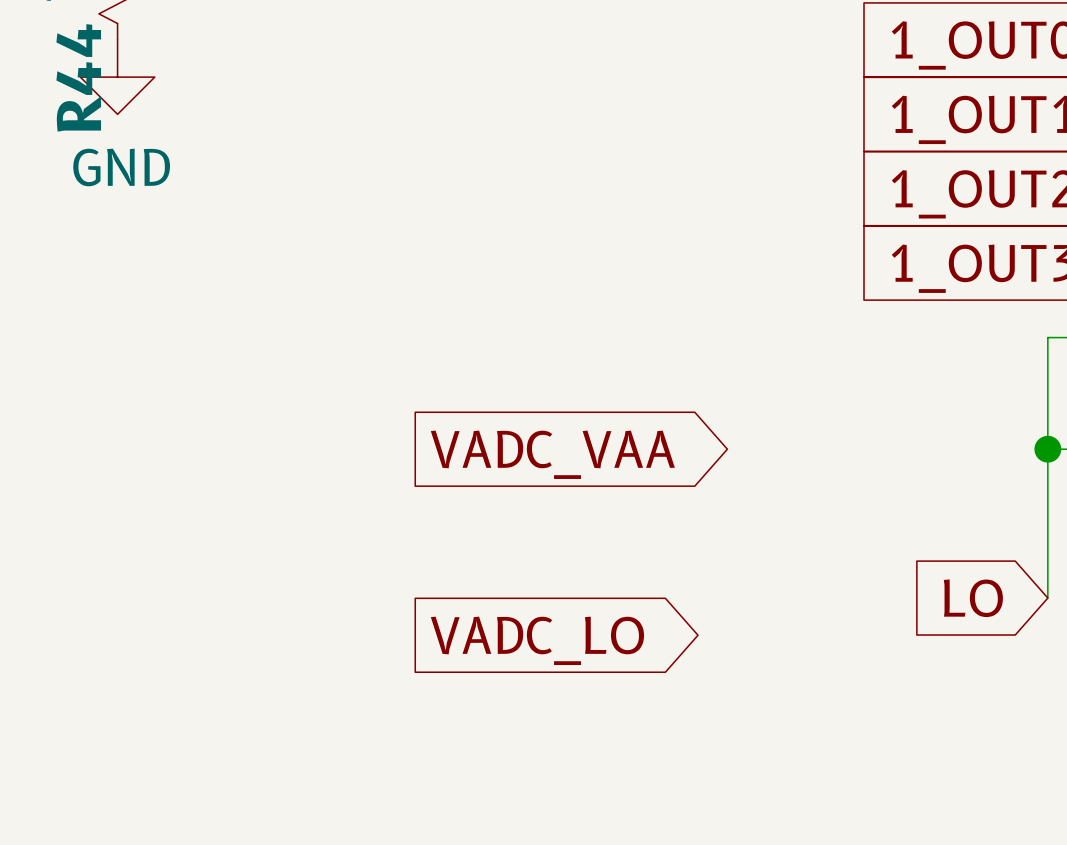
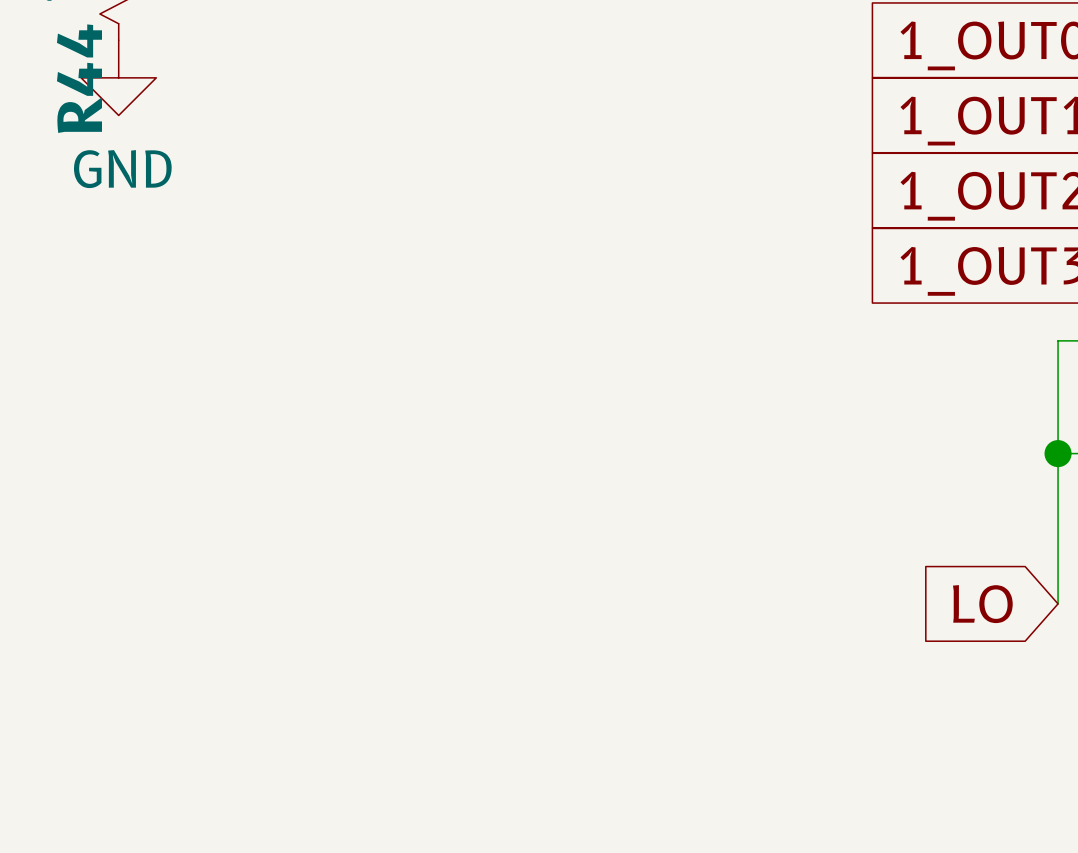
global label: VADC_VAA (552, 454) -> none
global label: VADC_LO (537, 640) -> none

